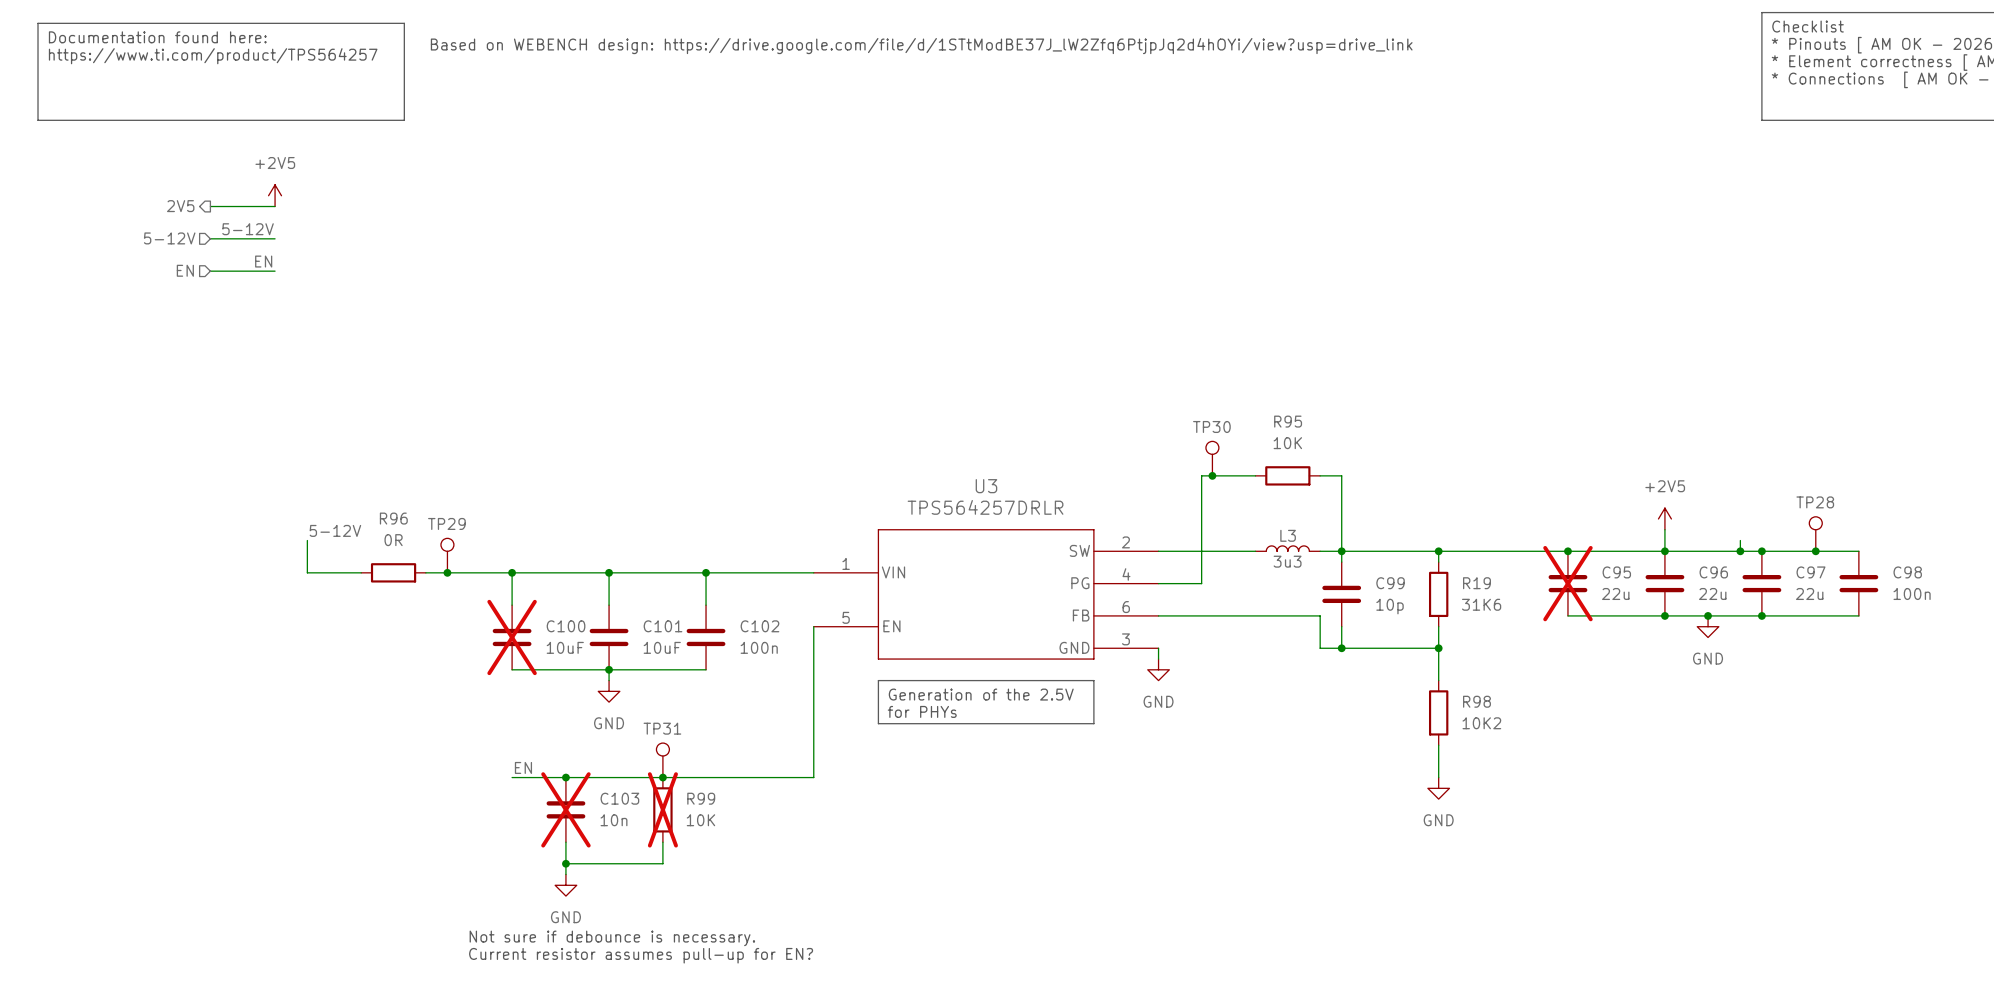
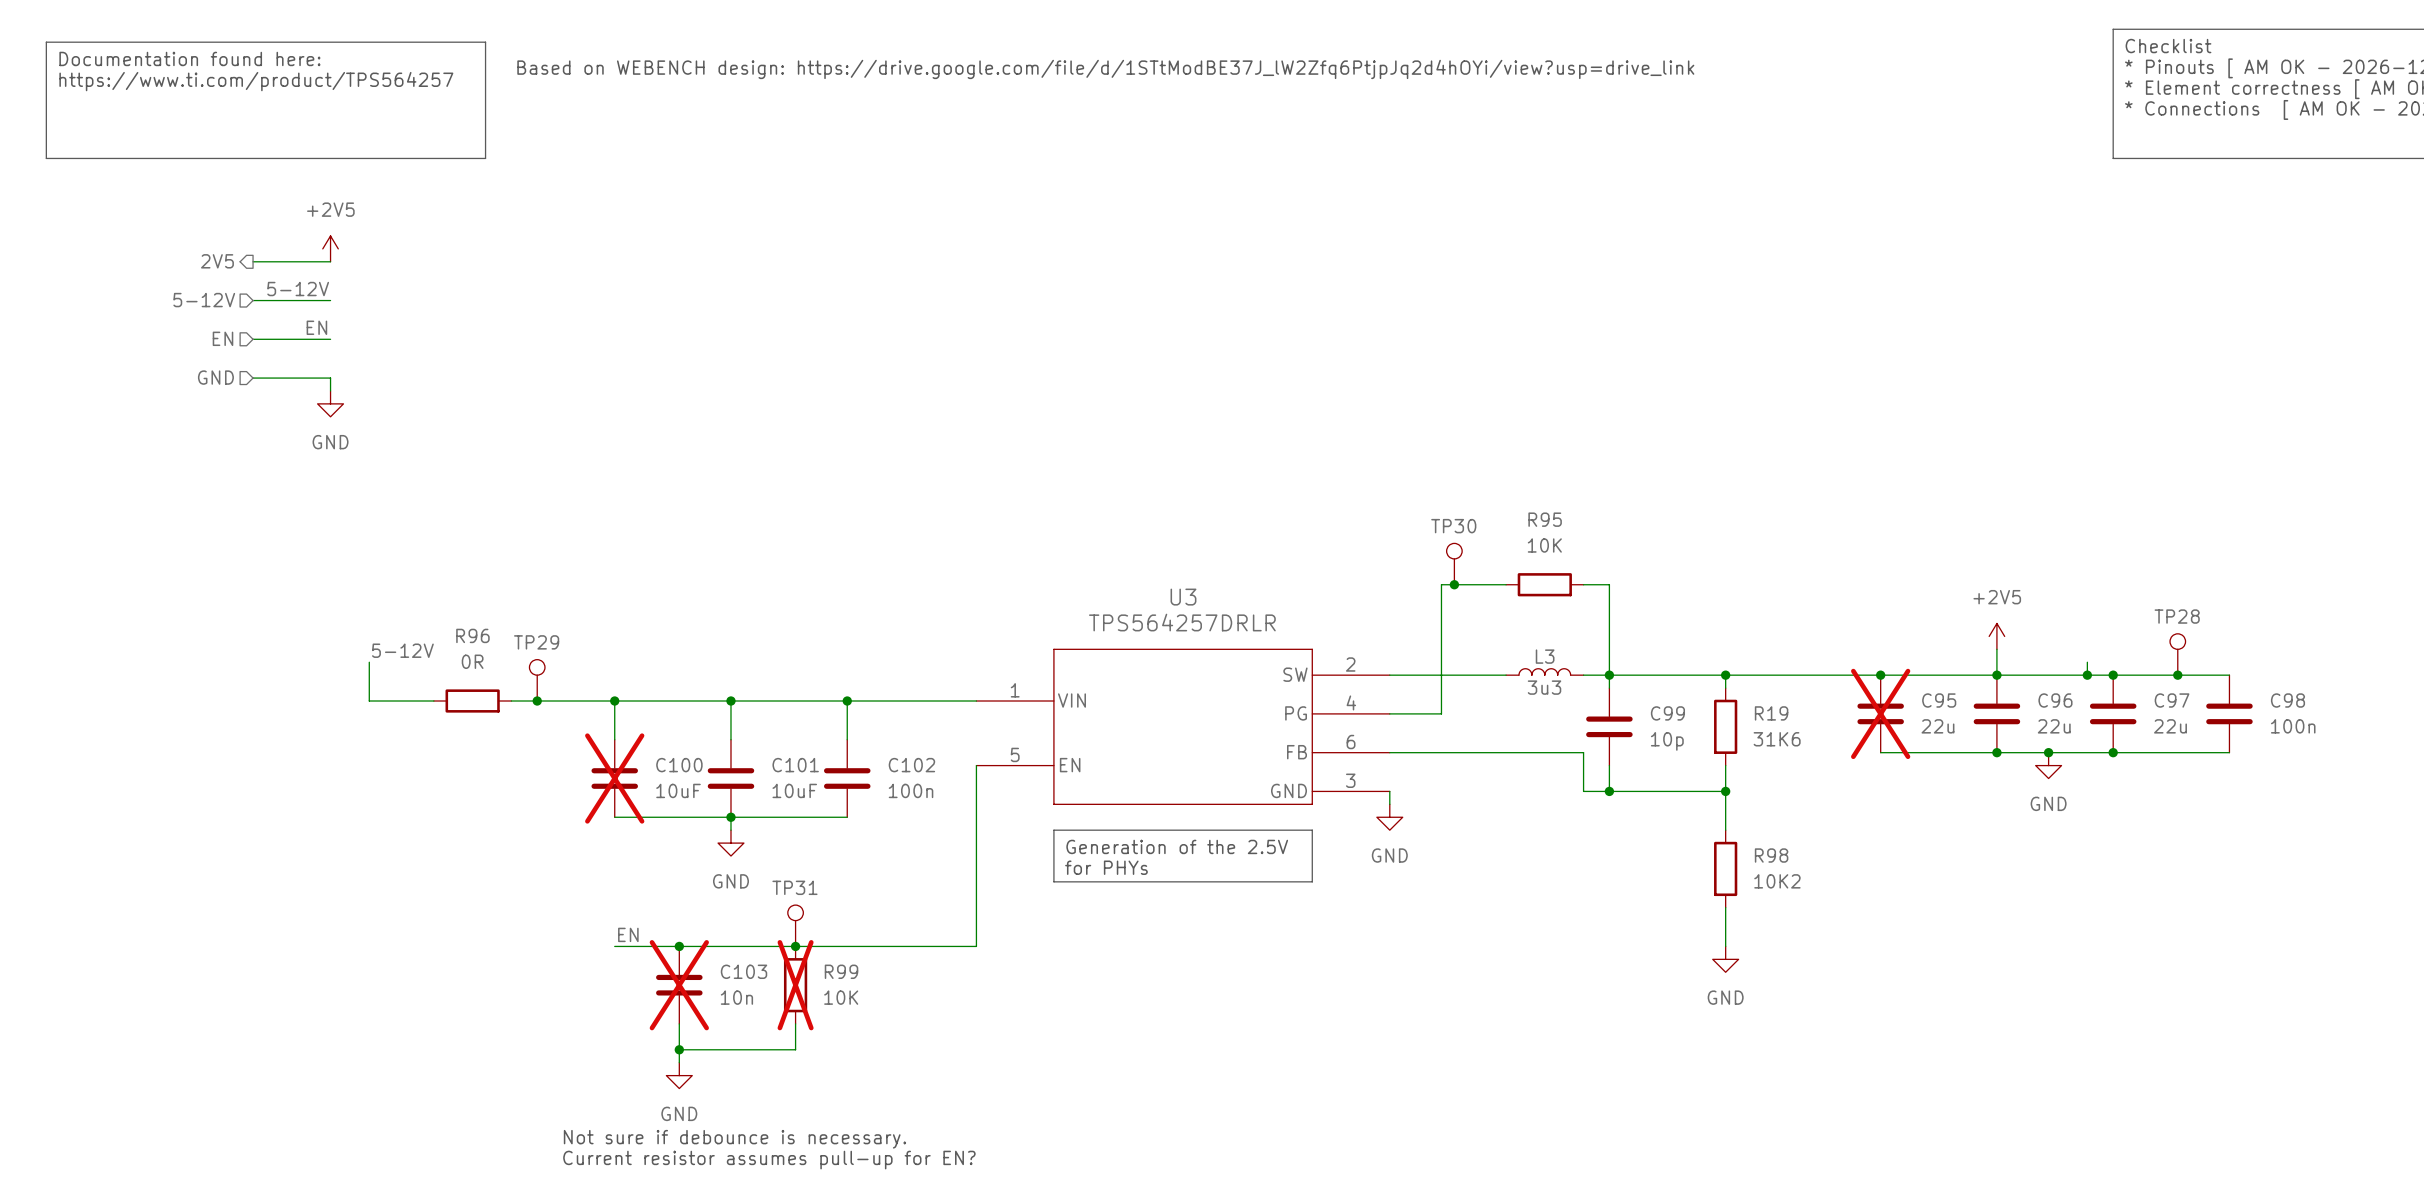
hierarchical label: none -> GND (215, 377)
wire: none -> (253, 378) (330, 378) (330, 390)
power symbol: none -> GND (330, 403)

